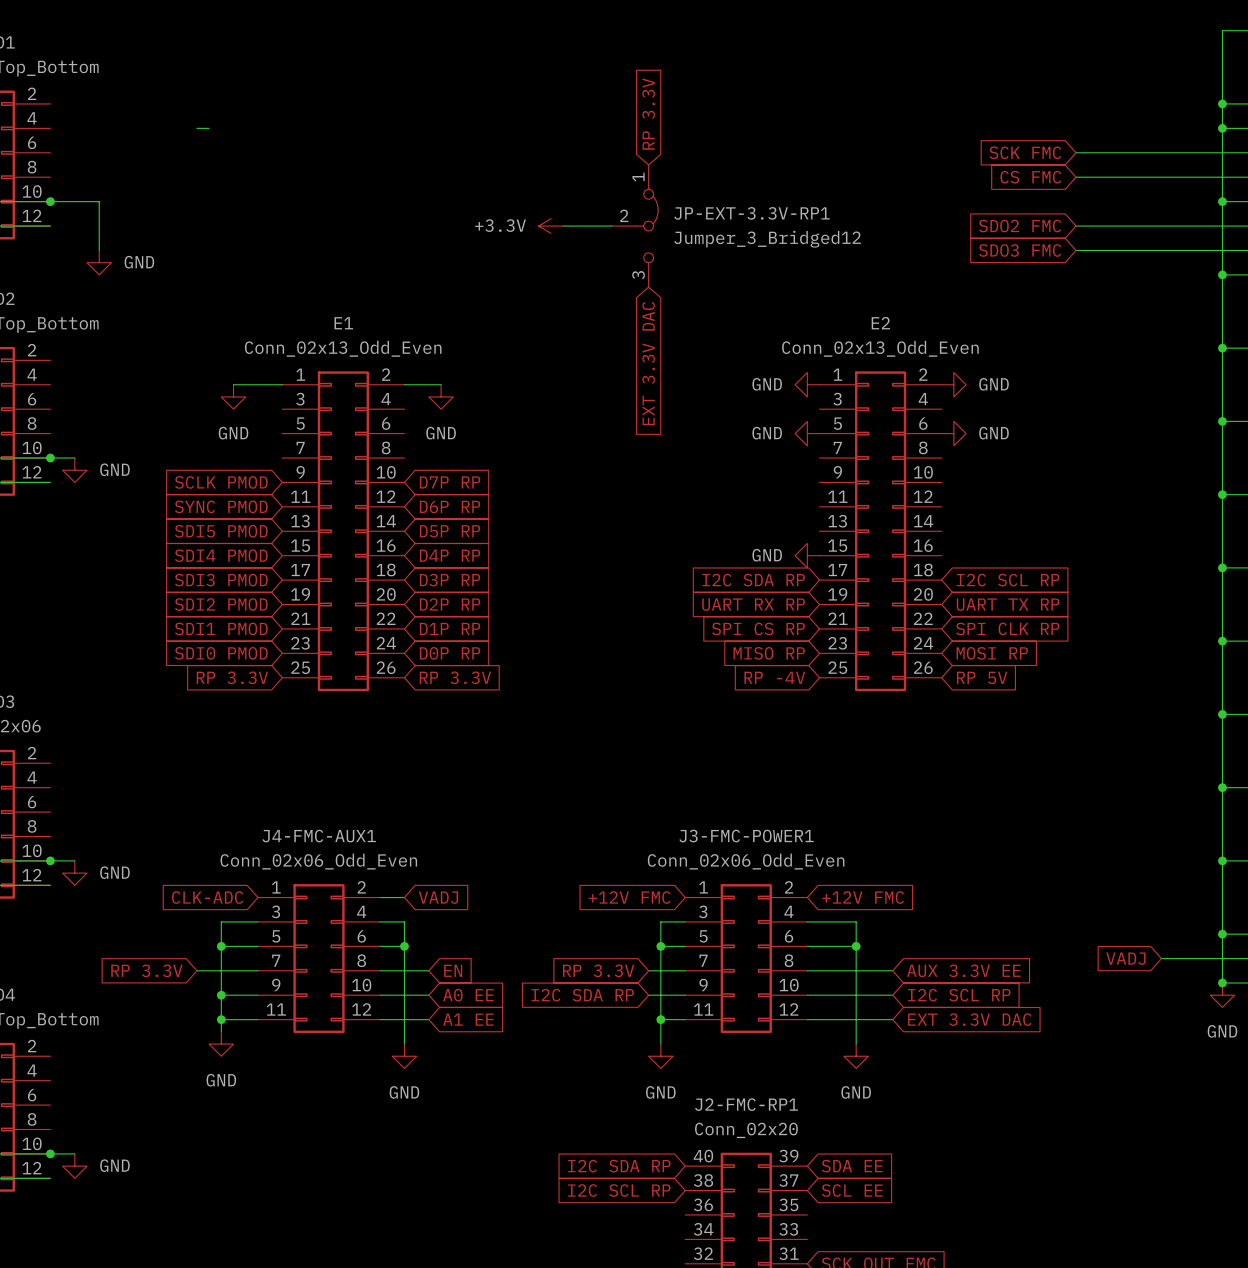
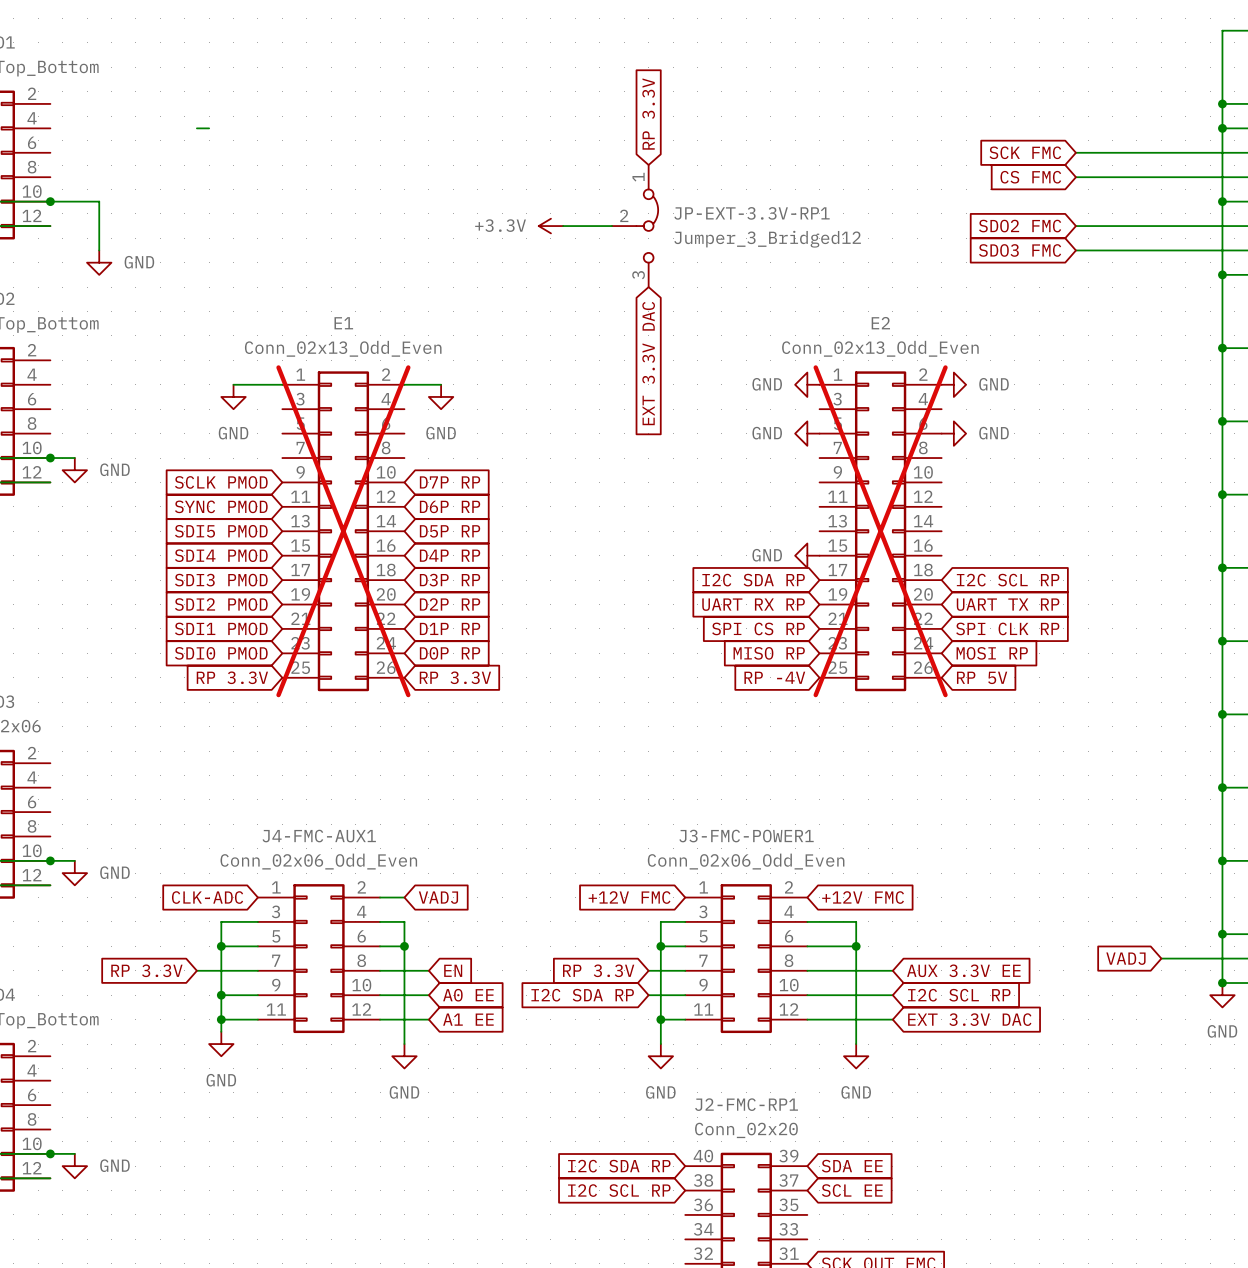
E1 do-not-place cross: none -> (343, 531)
E2 do-not-place cross: none -> (880, 531)

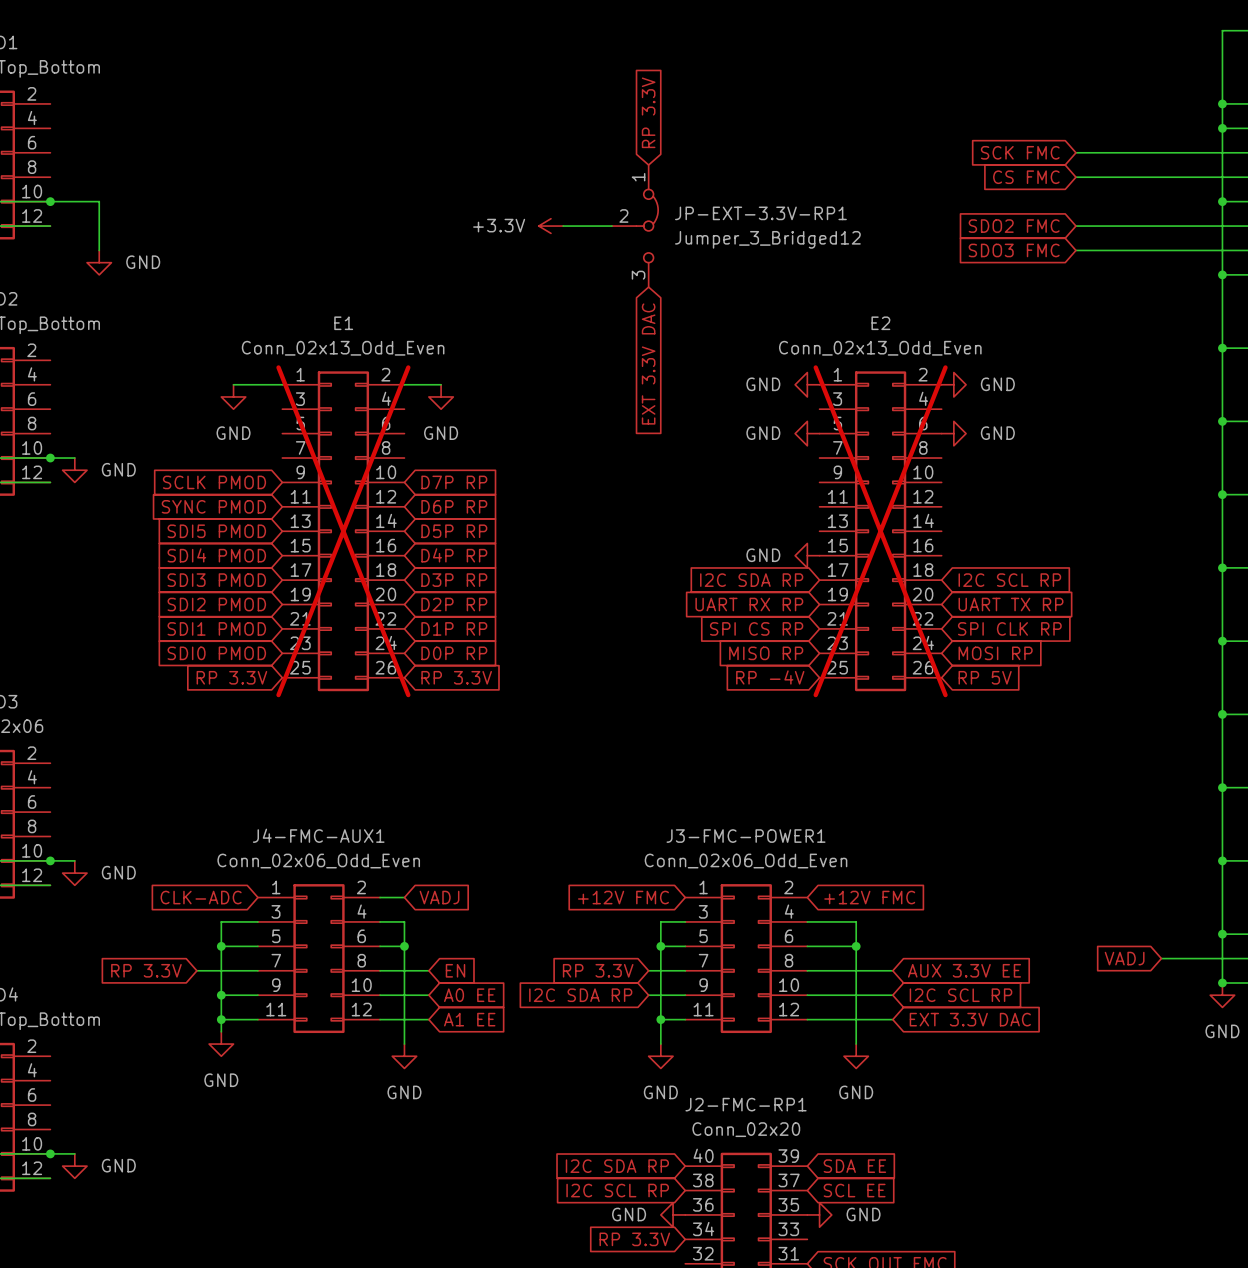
wire: (196, 128) (209, 128) -> none
power symbol: none -> GND (673, 1214)
power symbol: none -> GND (819, 1214)
global label: none -> RP 3.3V (634, 1239)

